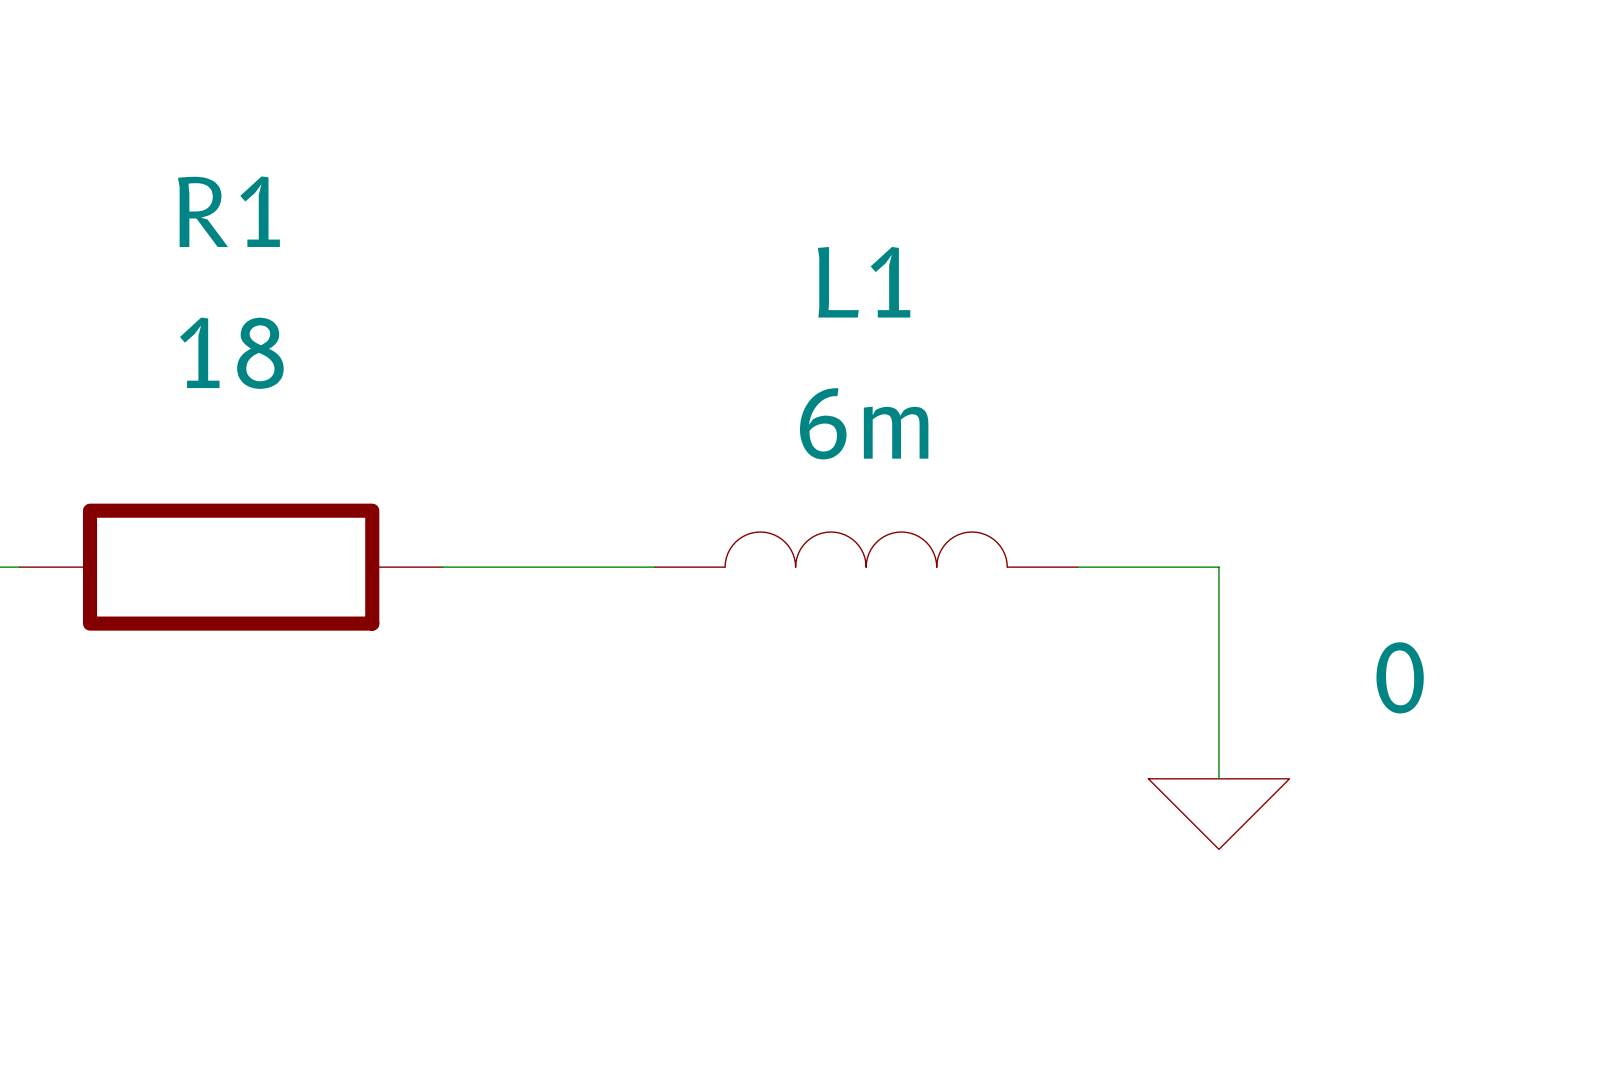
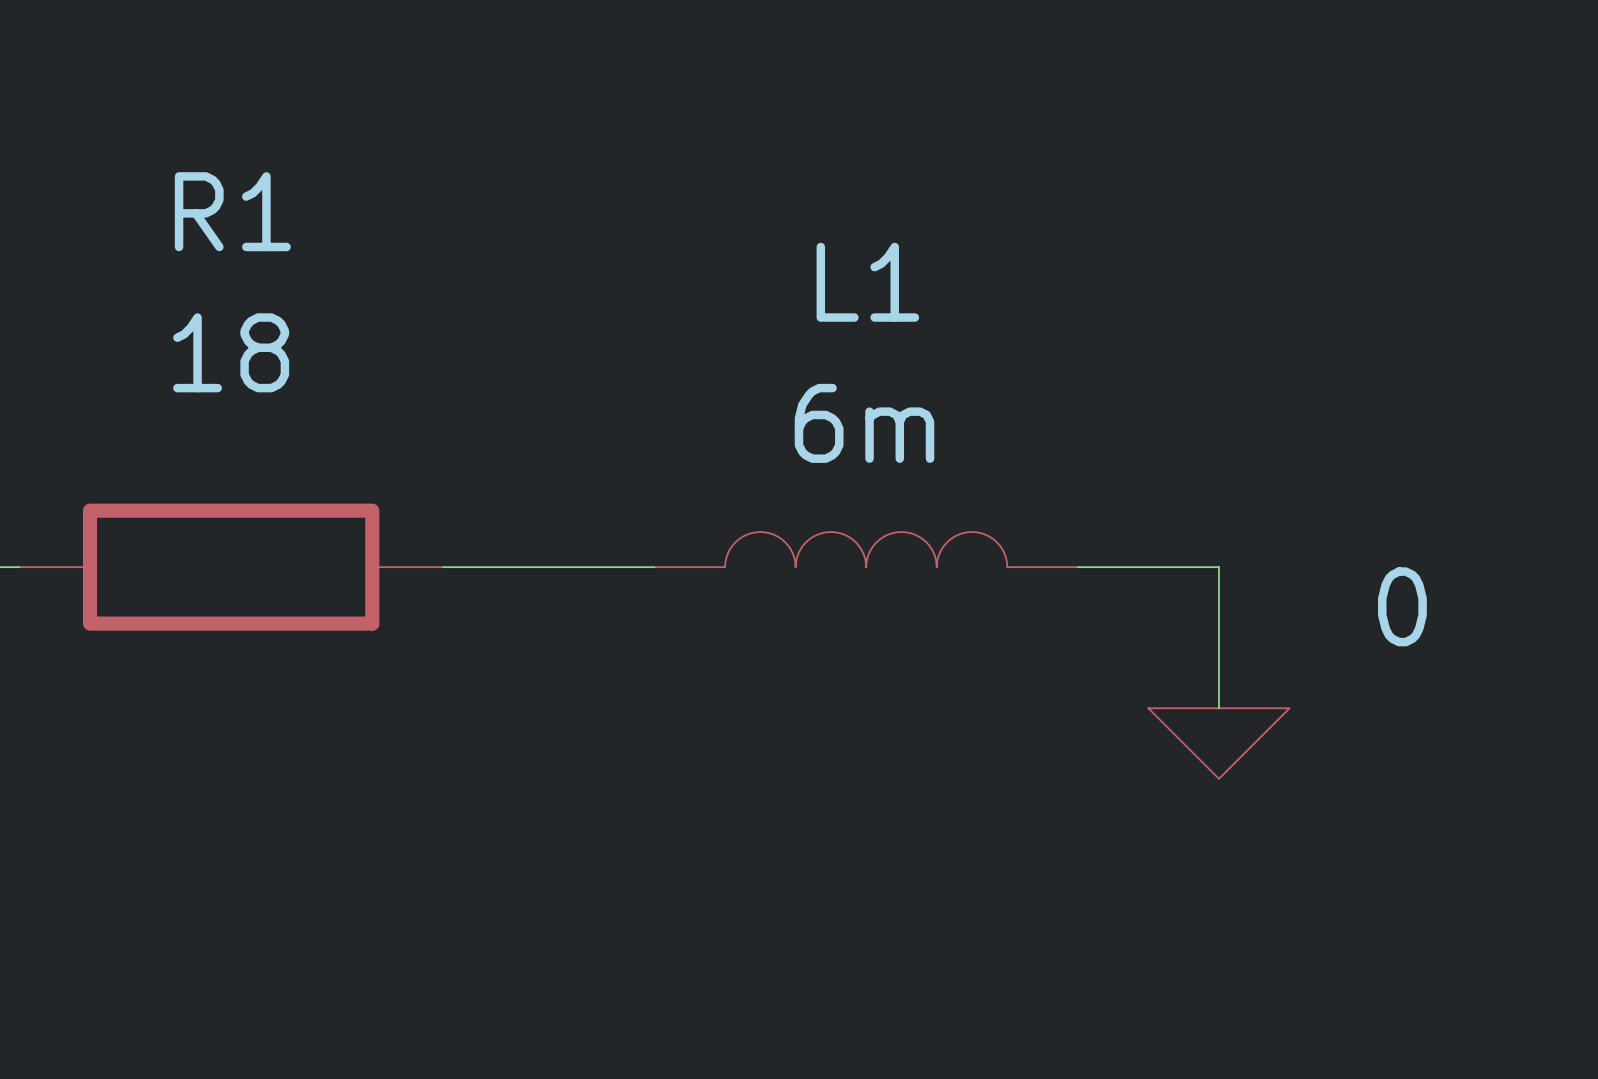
wire: (1218, 708) (1218, 778) -> none
power symbol position: 0 (1218, 814) -> 0 (1218, 743)

